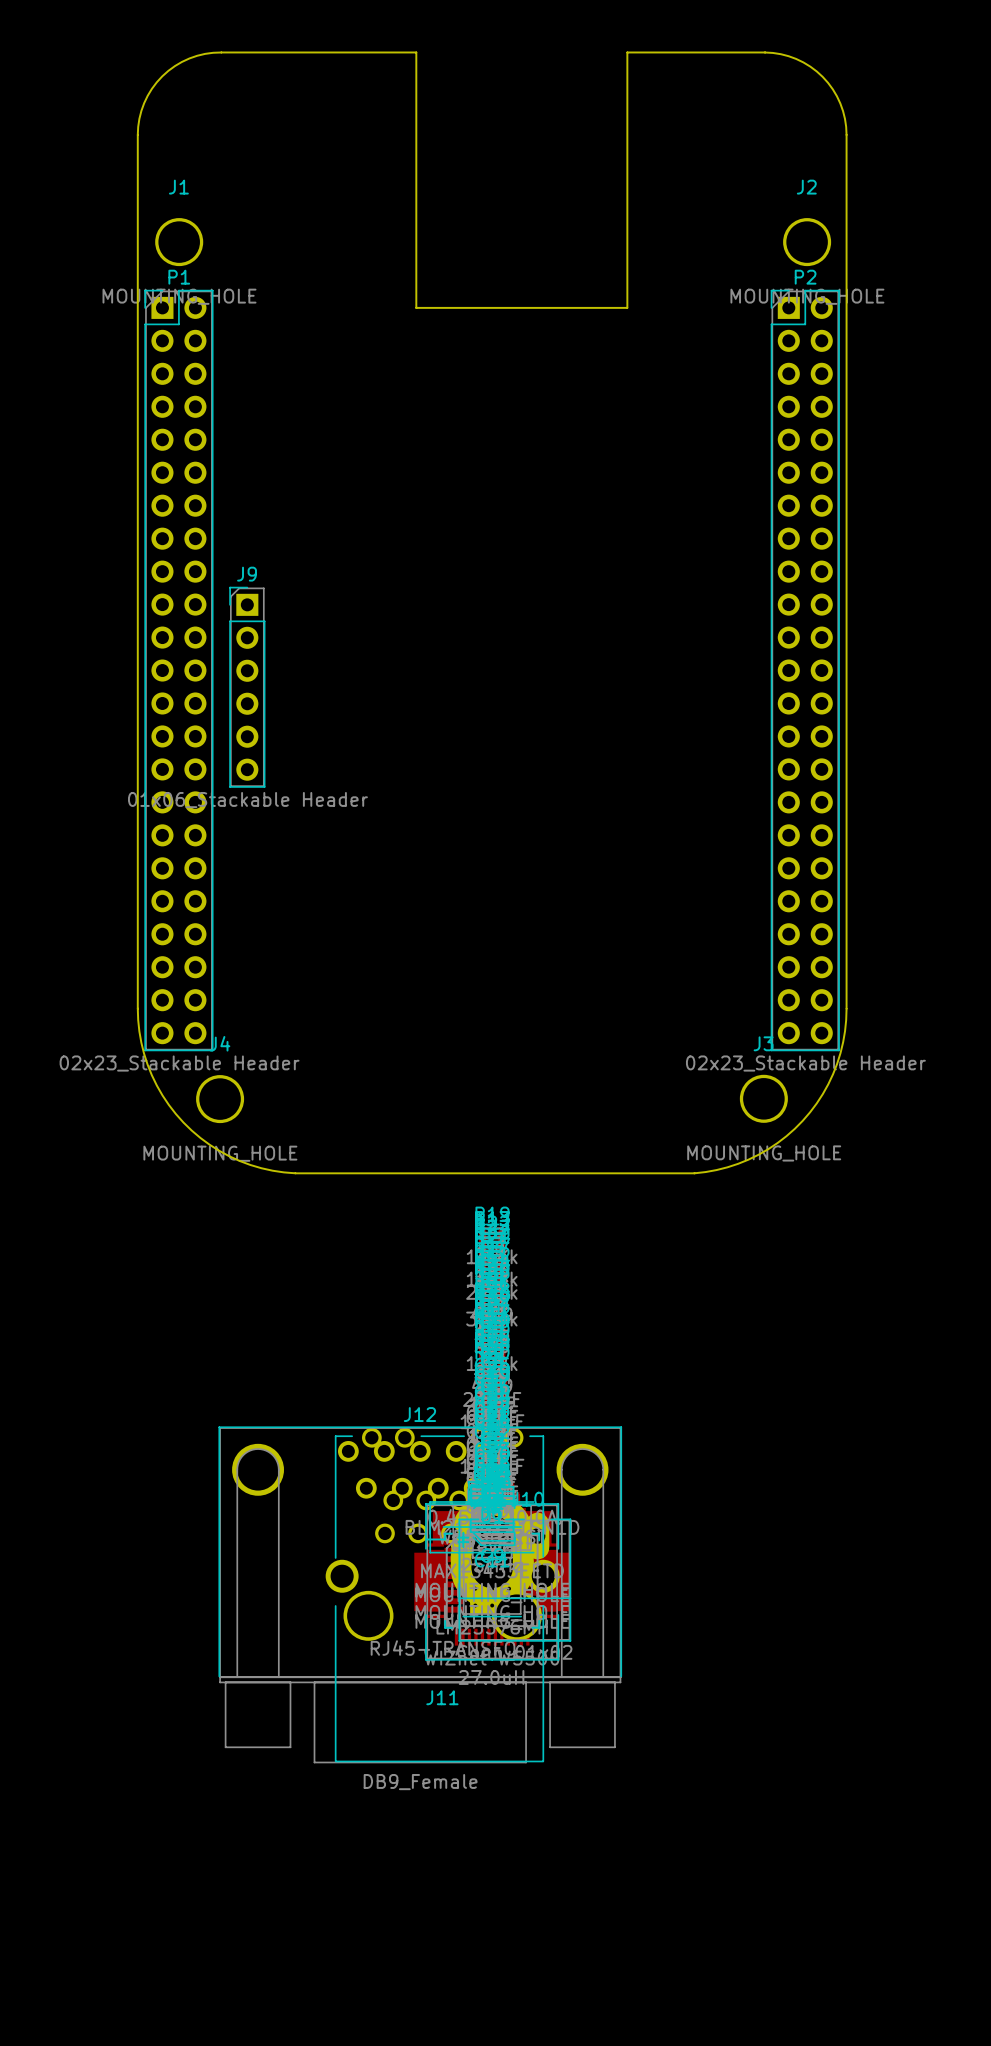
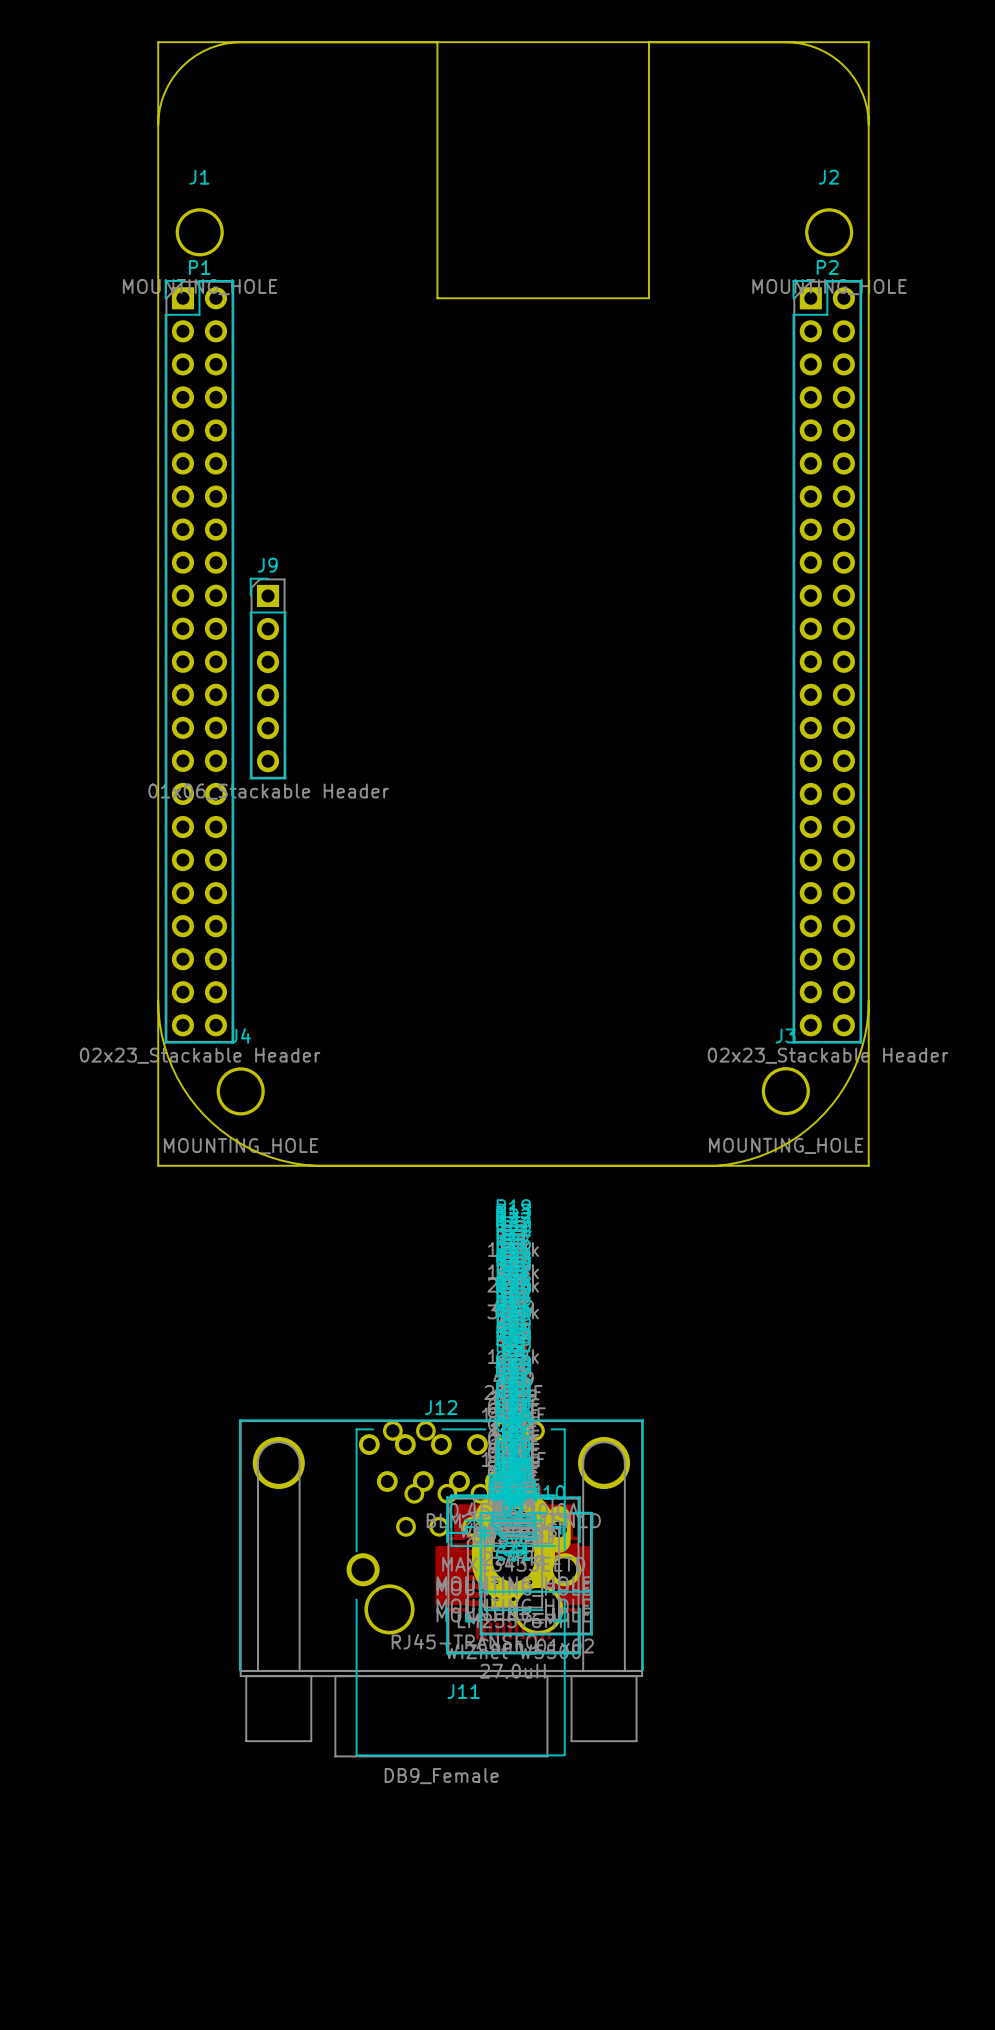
board edge: none -> (868, 124) (868, 42) (158, 42) (158, 124)
board edge: none -> (158, 1000) (158, 1165) (868, 1165) (868, 1000)

